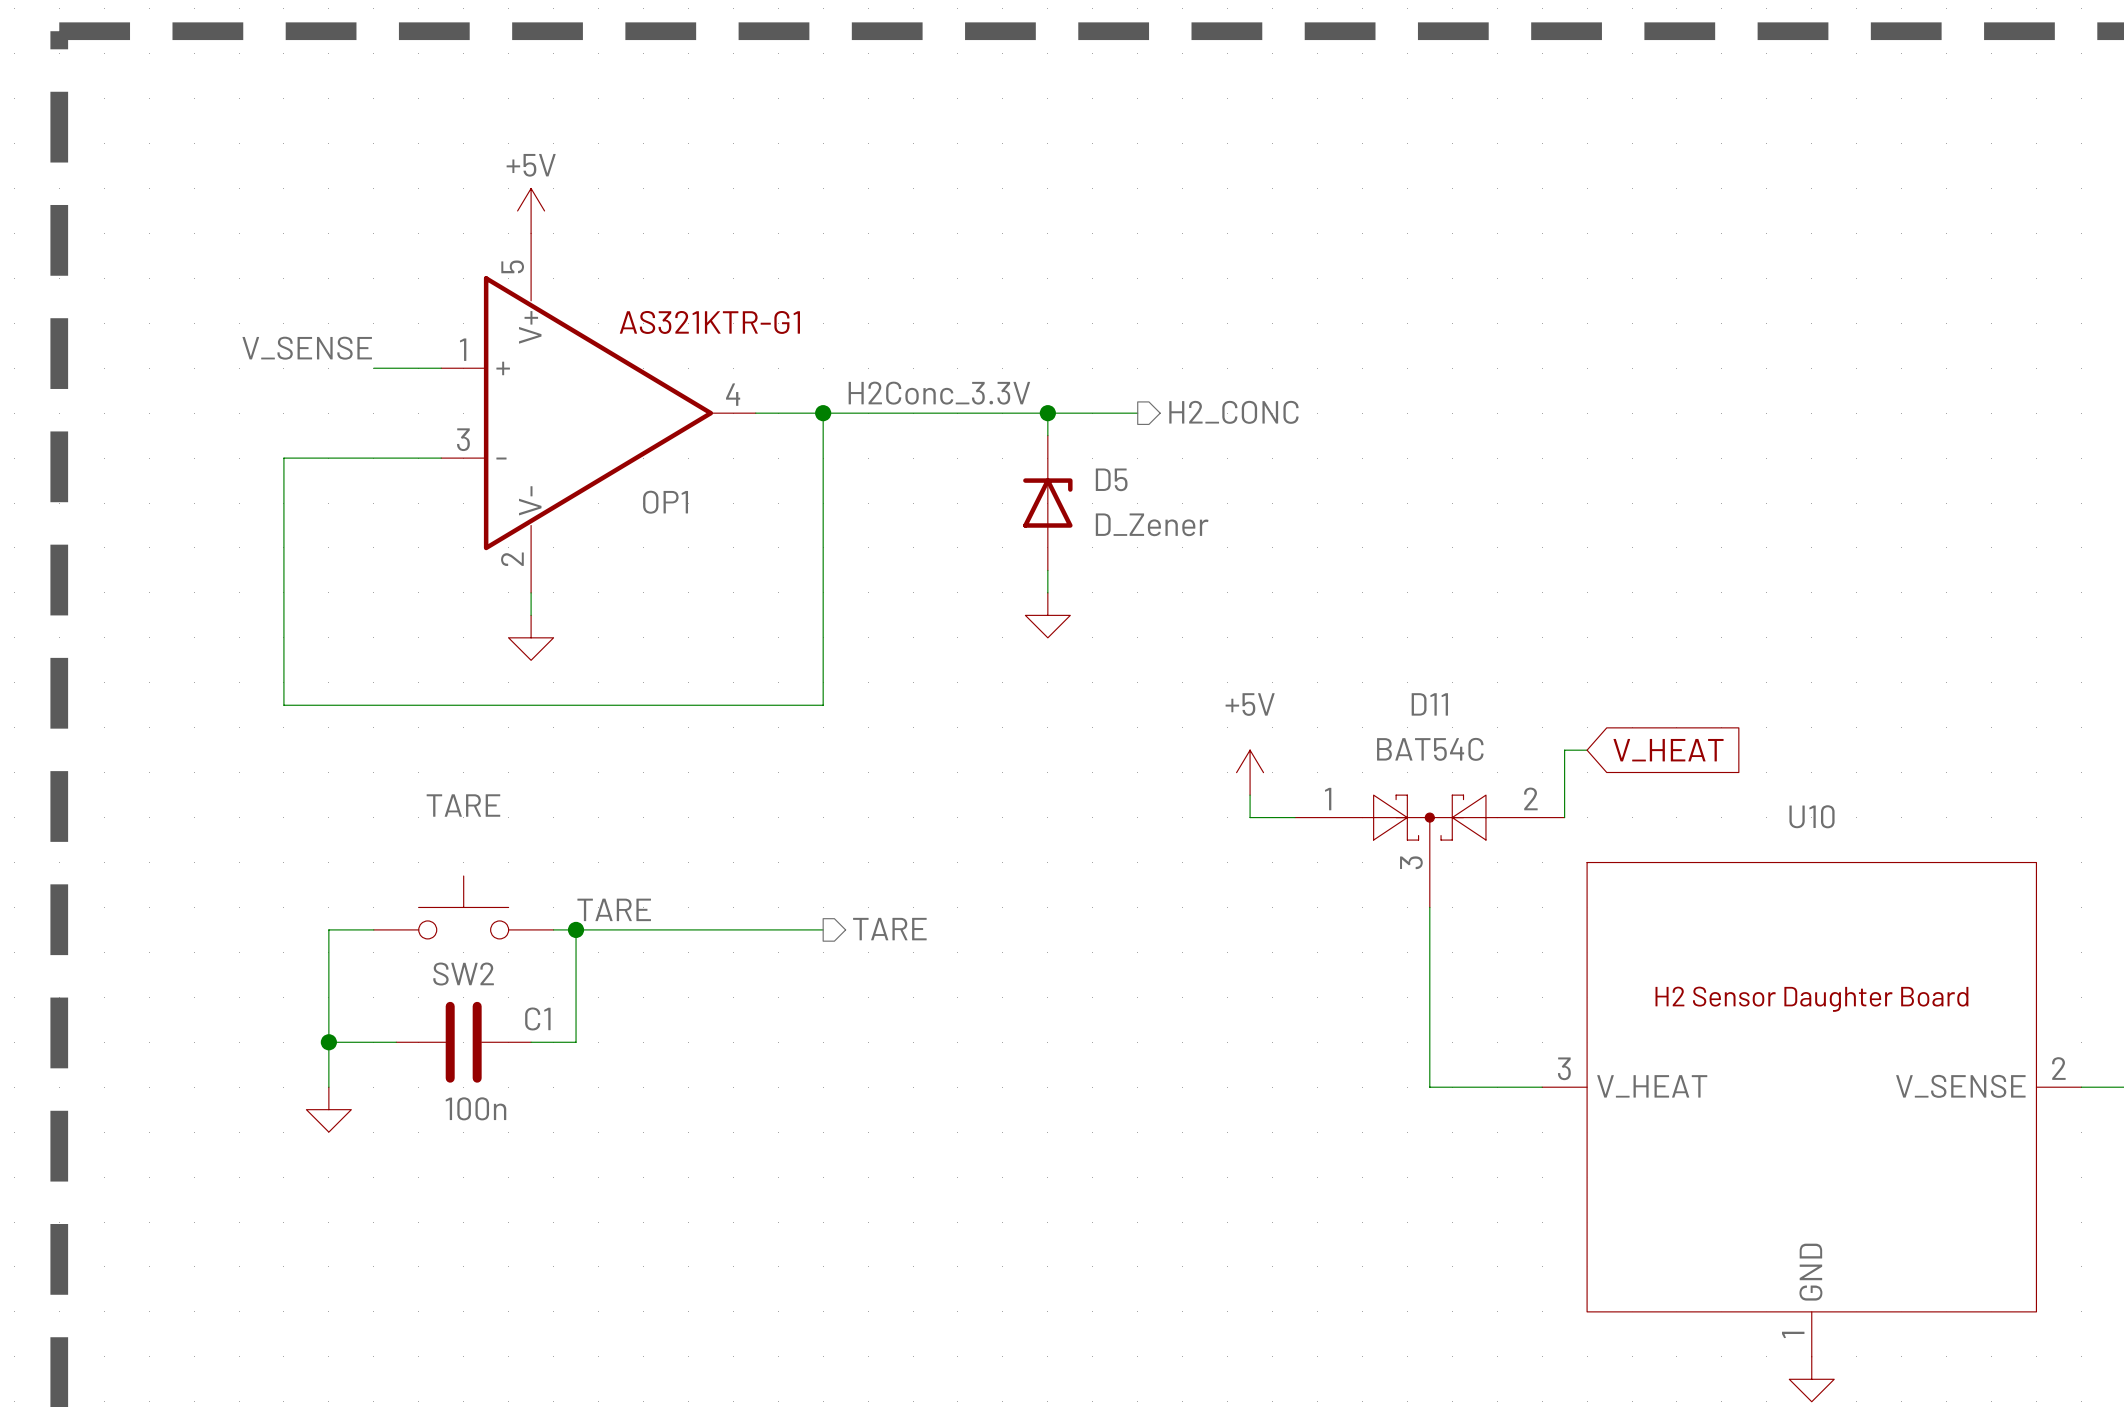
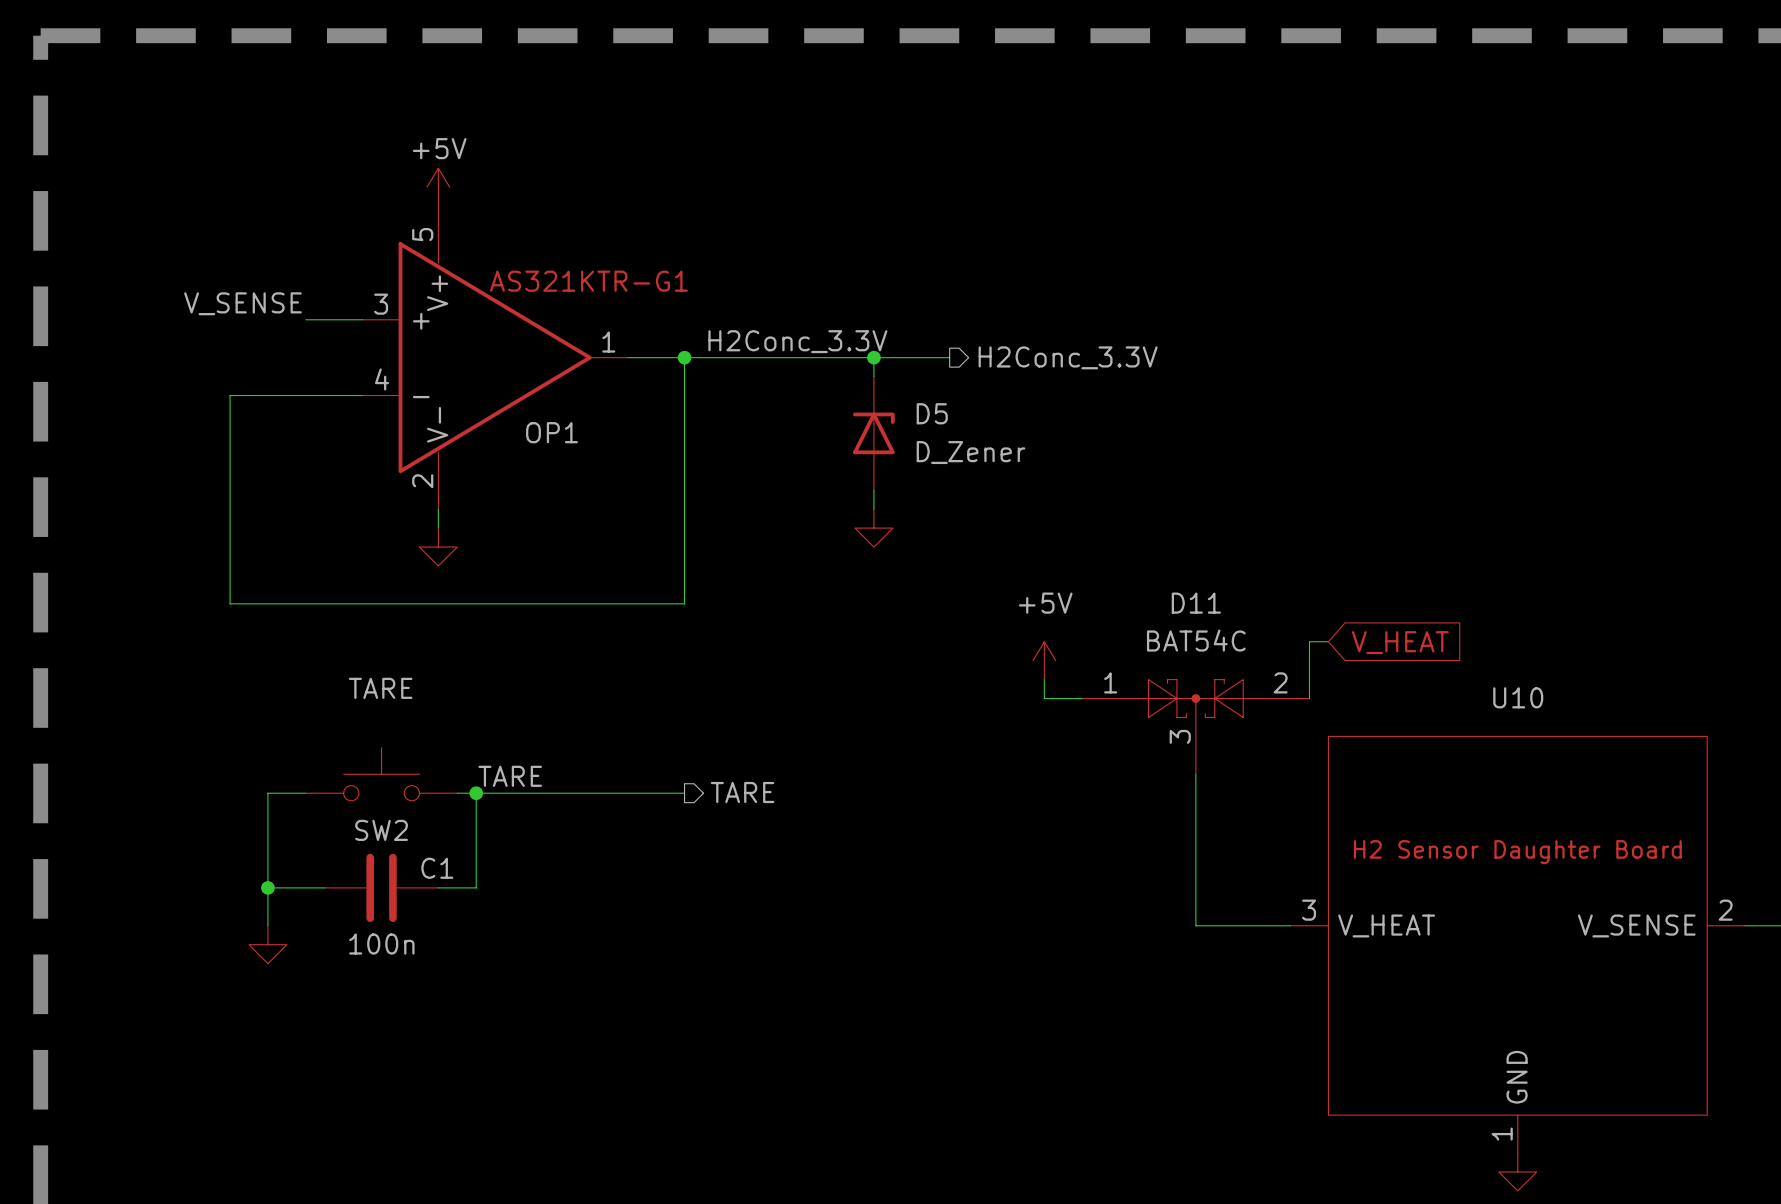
OP1 pin number: 1 (463, 349) -> 3 (381, 304)
OP1 pin number: 4 (733, 394) -> 1 (608, 342)
hierarchical label: H2_CONC (1233, 412) -> H2Conc_3.3V (1068, 357)
OP1 pin number: 3 (463, 439) -> 4 (382, 379)

